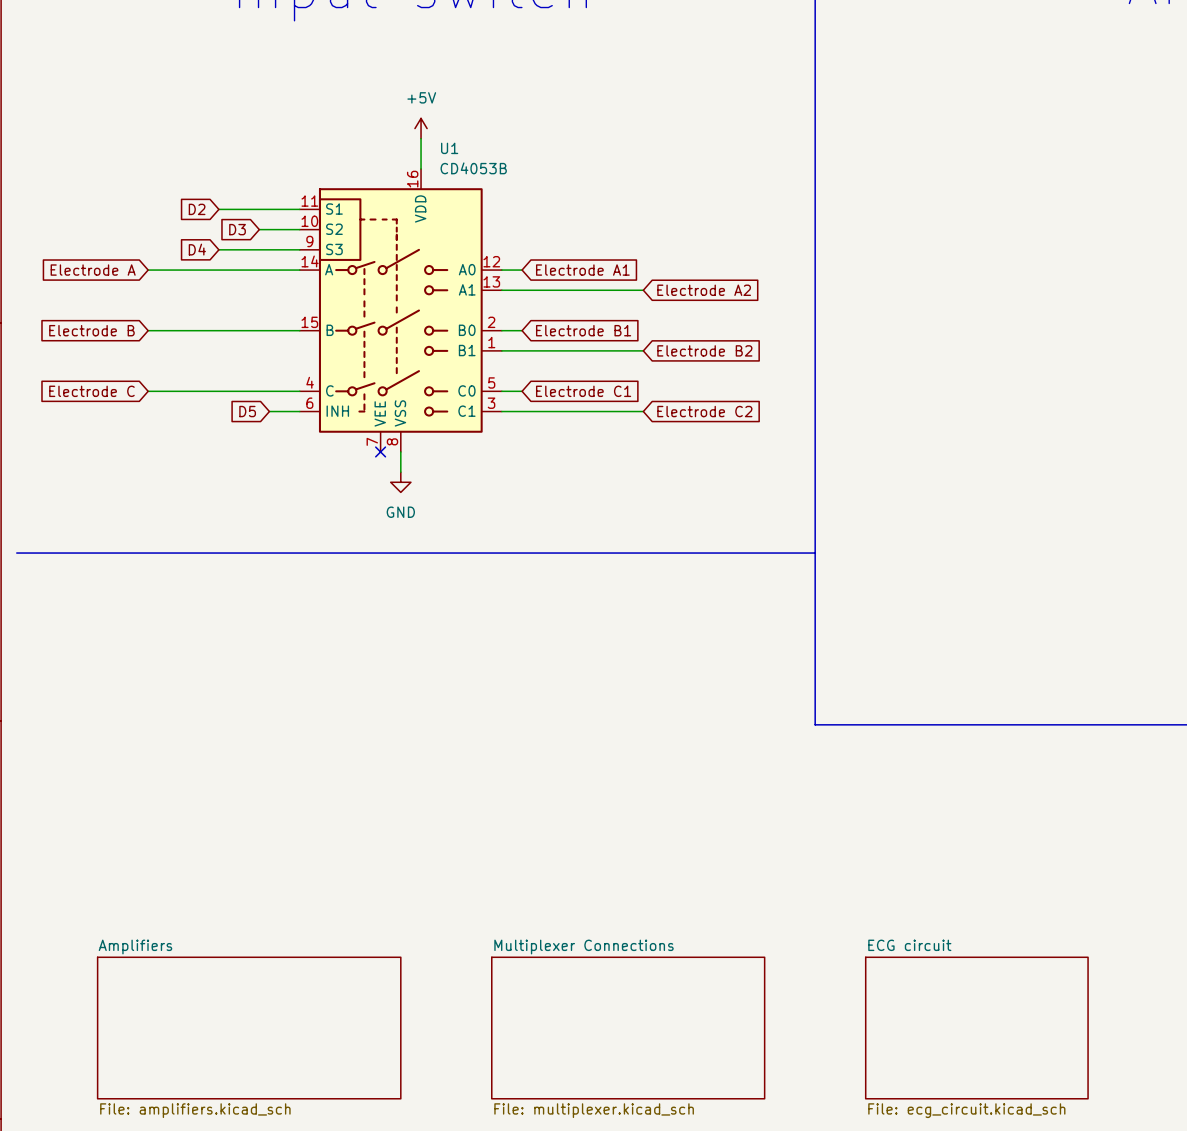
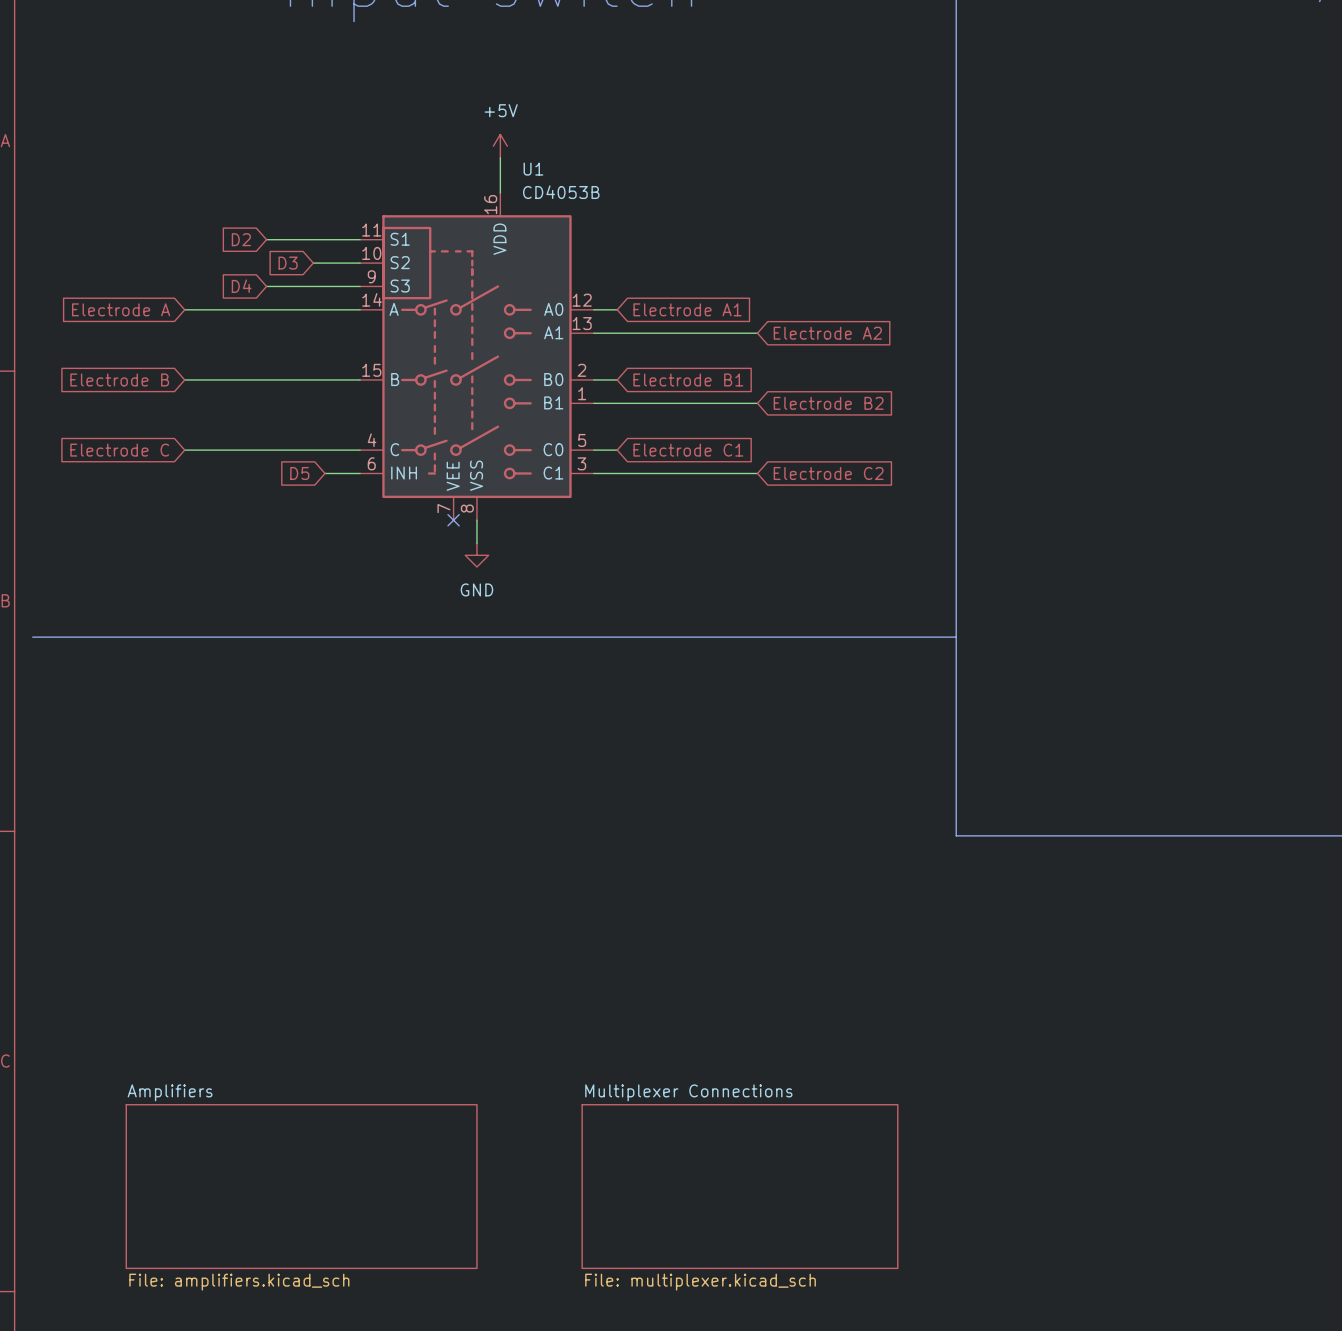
sheet ECG circuit: File: ecg_circuit.kicad_sch (976, 1028) -> none

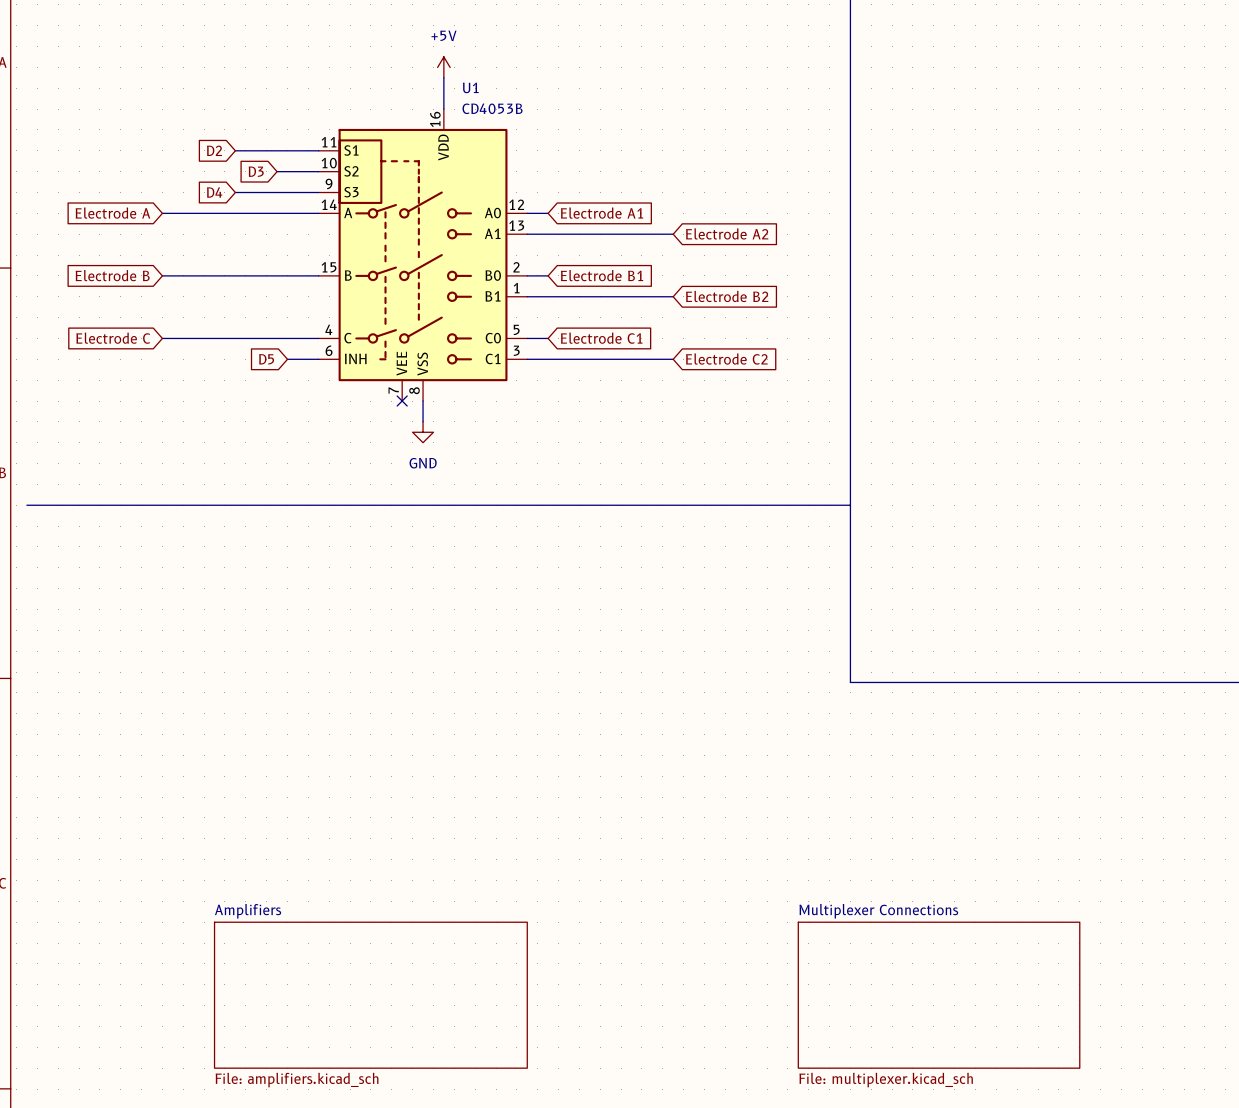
sheet Amplifiers position: (301, 1186) -> (370, 995)
sheet Multiplexer Connections: File: multiplexer.kicad_sch (739, 1186) -> none
sheet Multiplexer Connections: none -> File: multiplexer.kicad_sch (939, 995)

